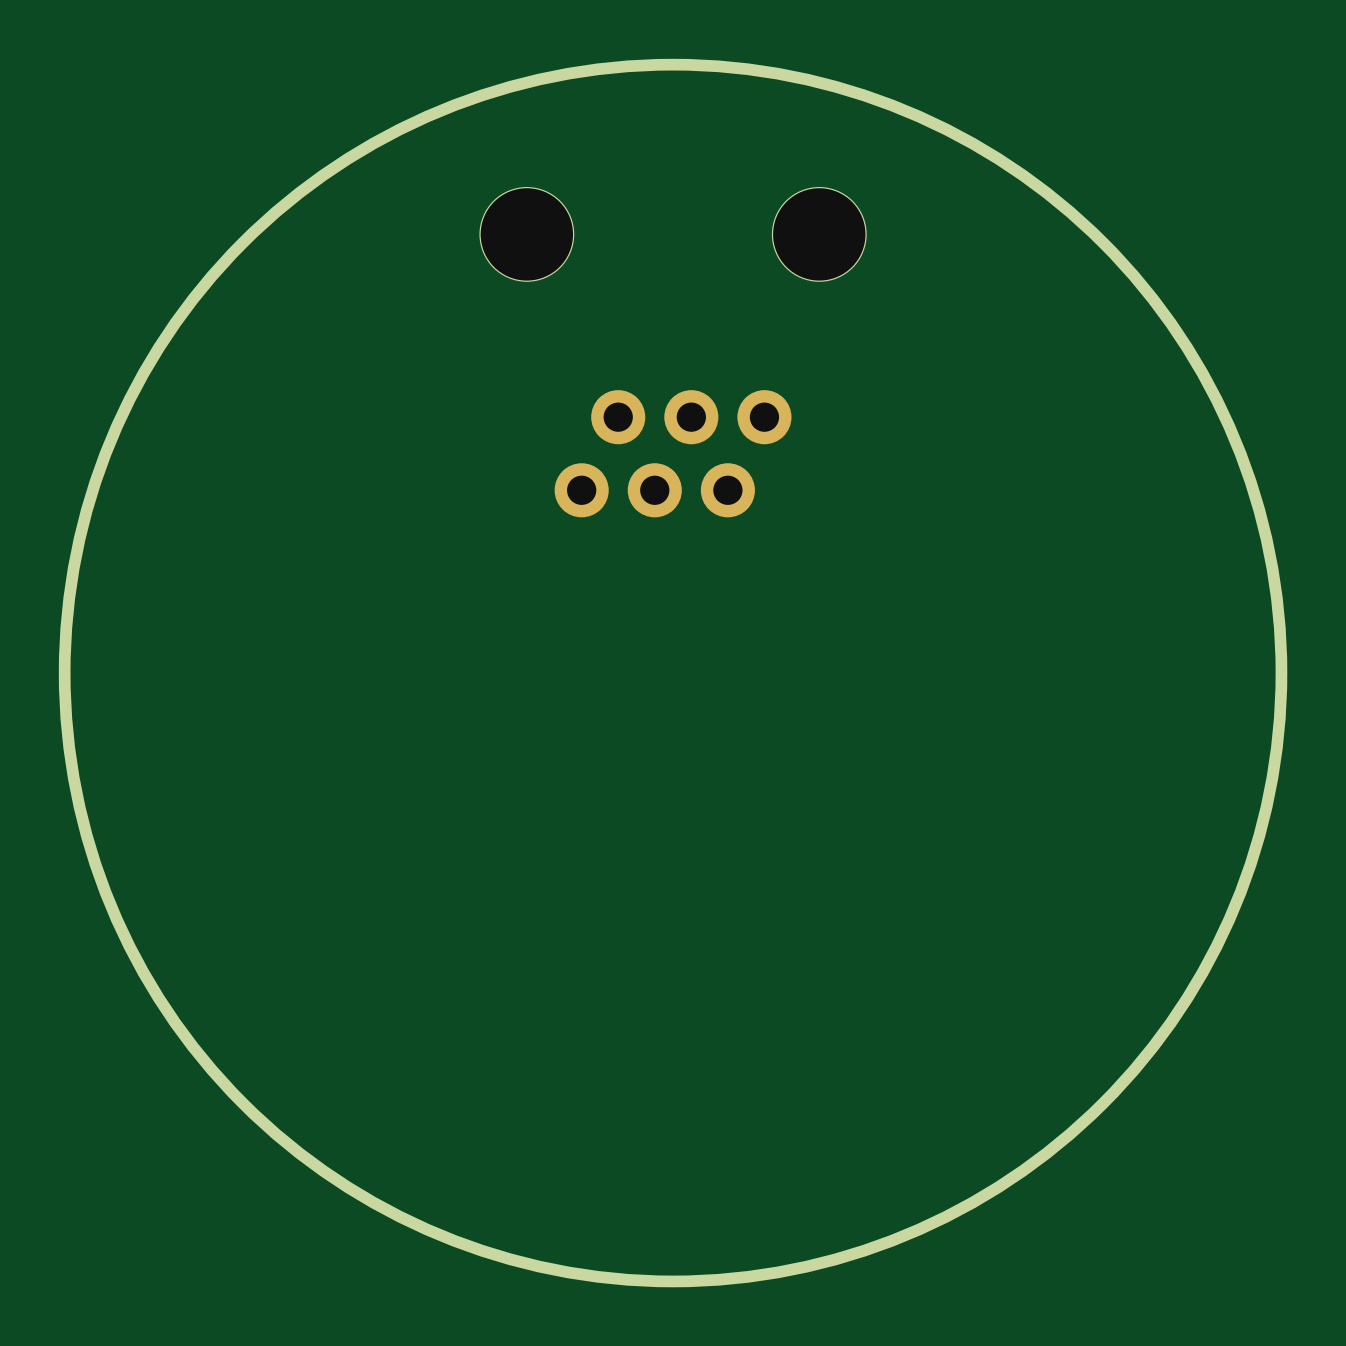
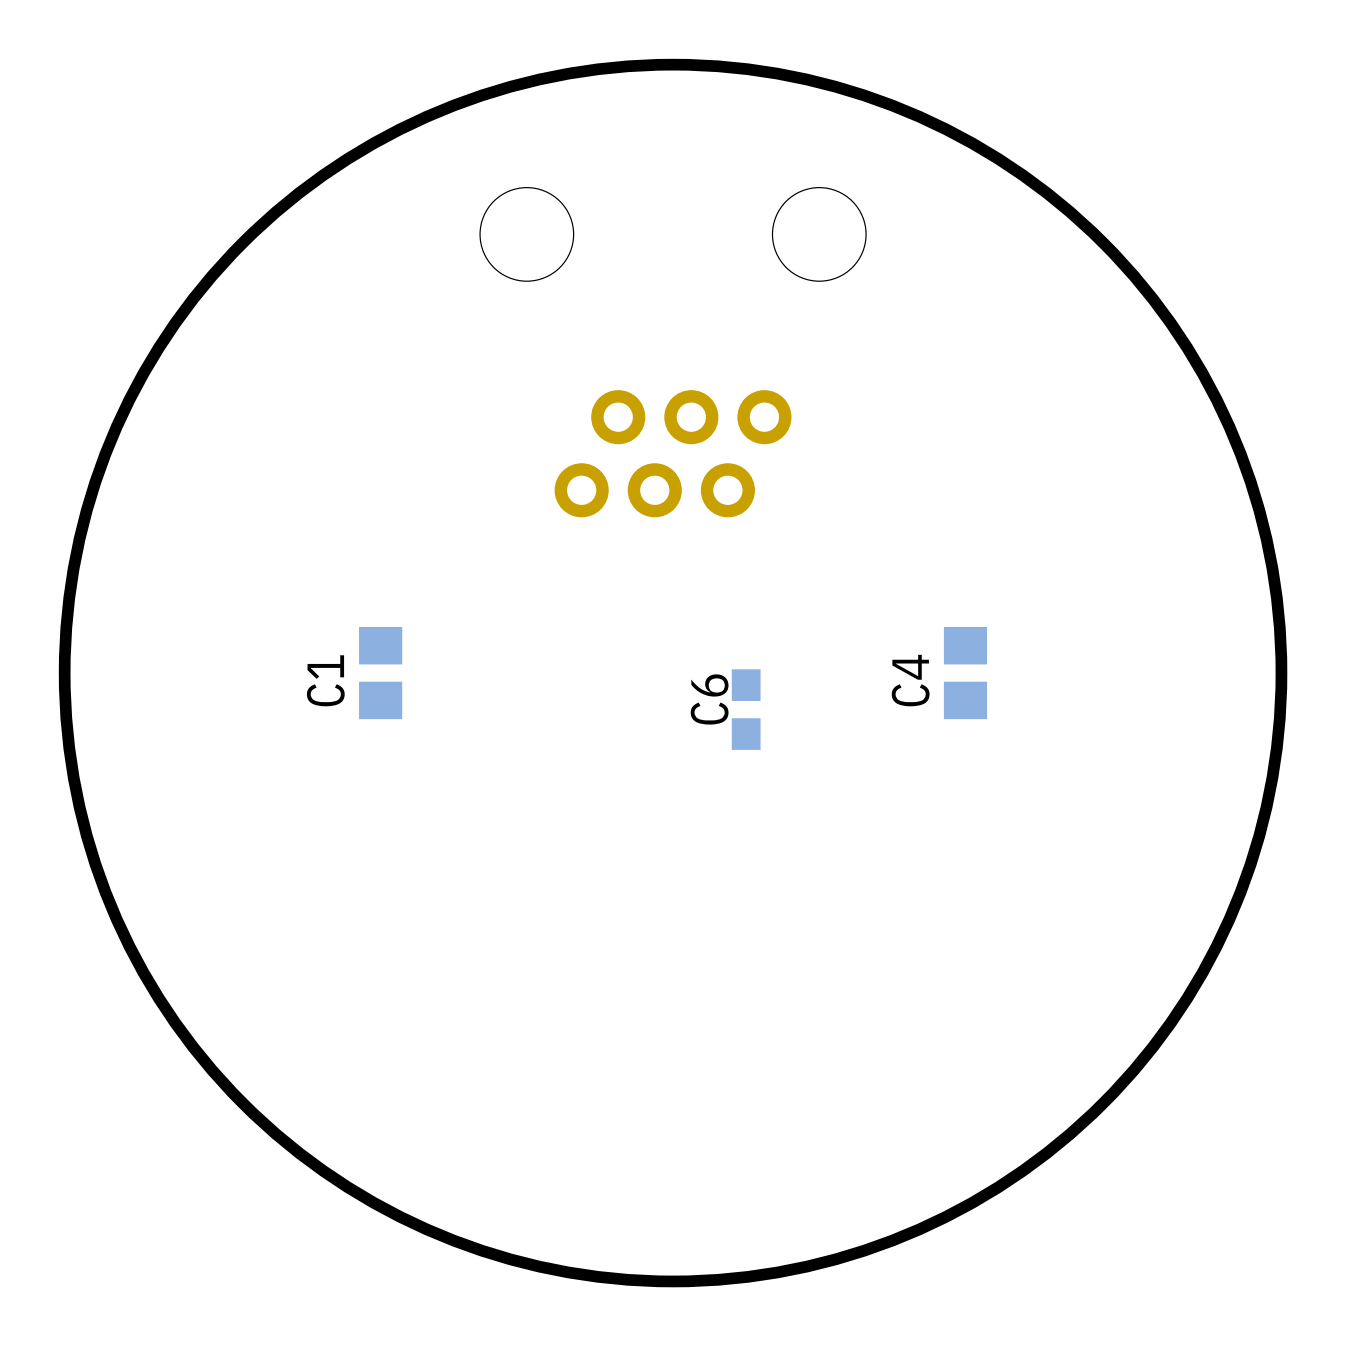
C1: none -> (380, 673)
C4: none -> (965, 673)
C6: none -> (746, 709)

